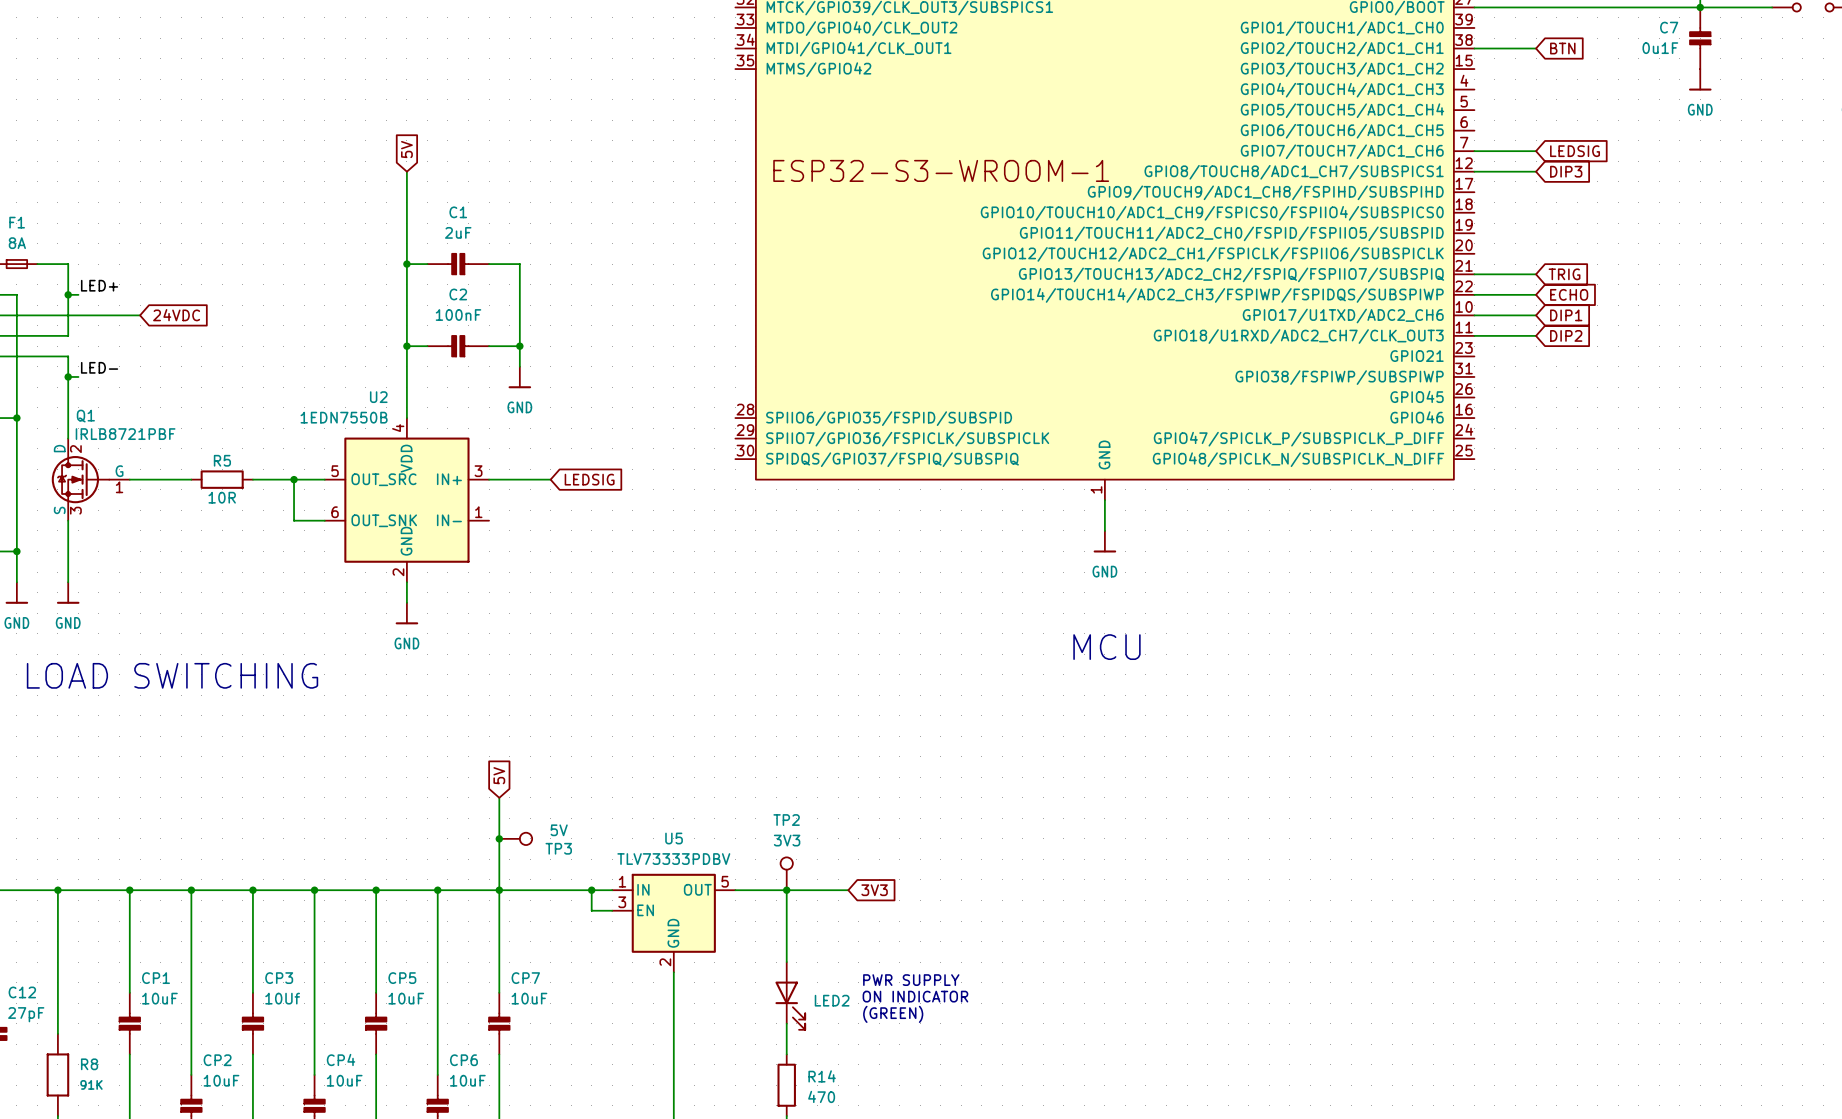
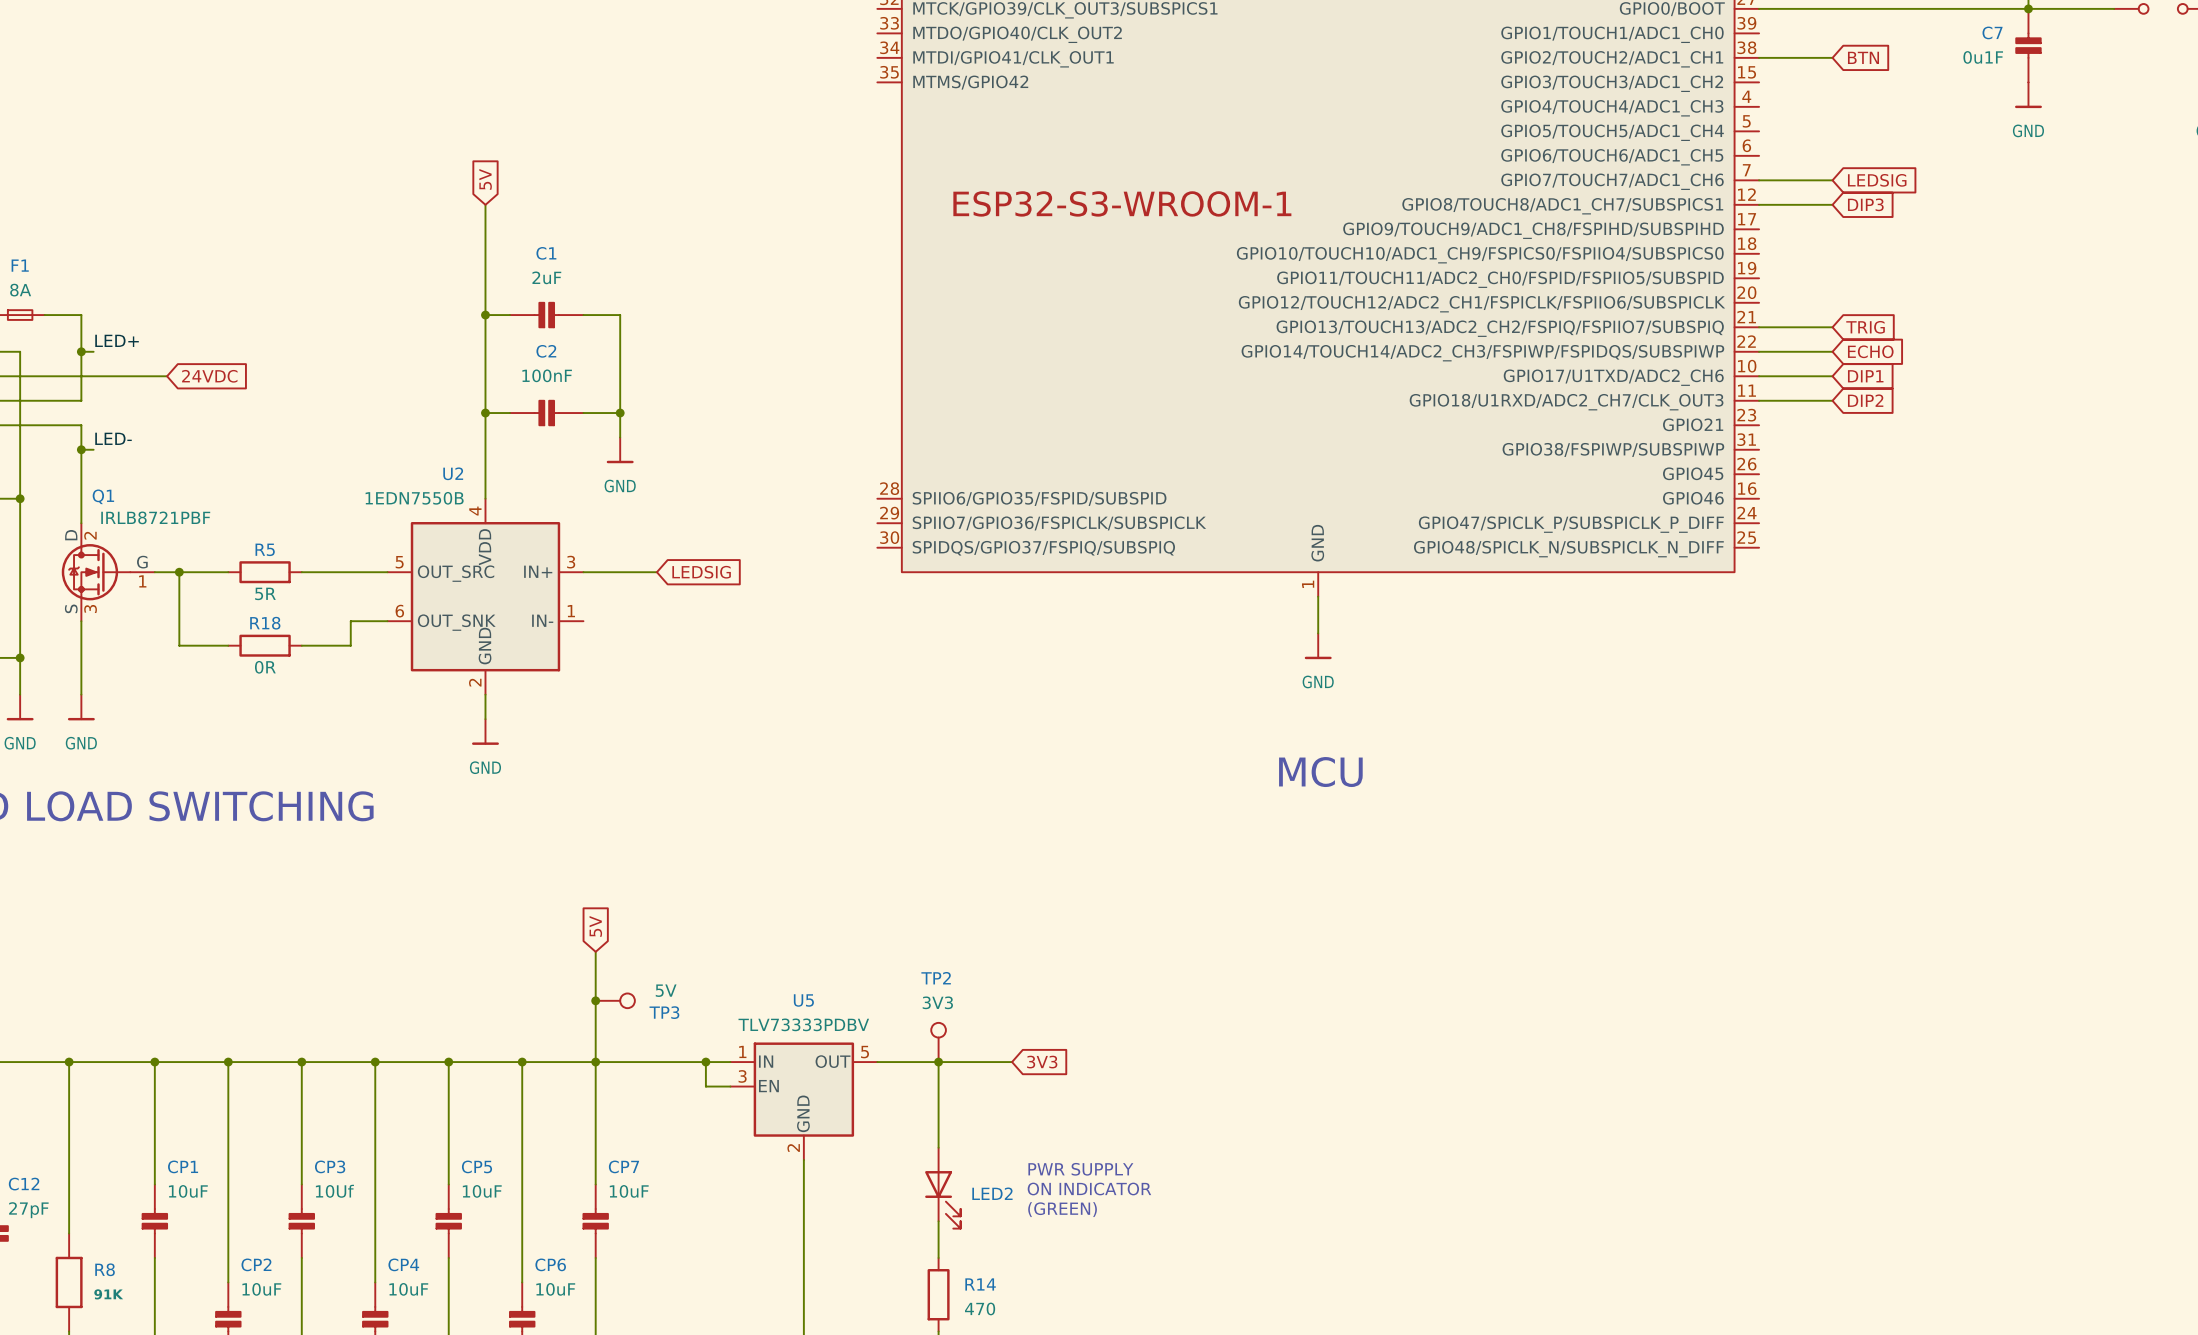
wire: none -> (179, 572) (179, 645) (228, 645)
junction: none -> (179, 572)
wire: (294, 479) (294, 520) -> (301, 645) (350, 645) (350, 621)
junction: (294, 479) -> none
R5 value: 10R (222, 497) -> 5R (265, 593)
R18: none -> 0R (265, 645)

